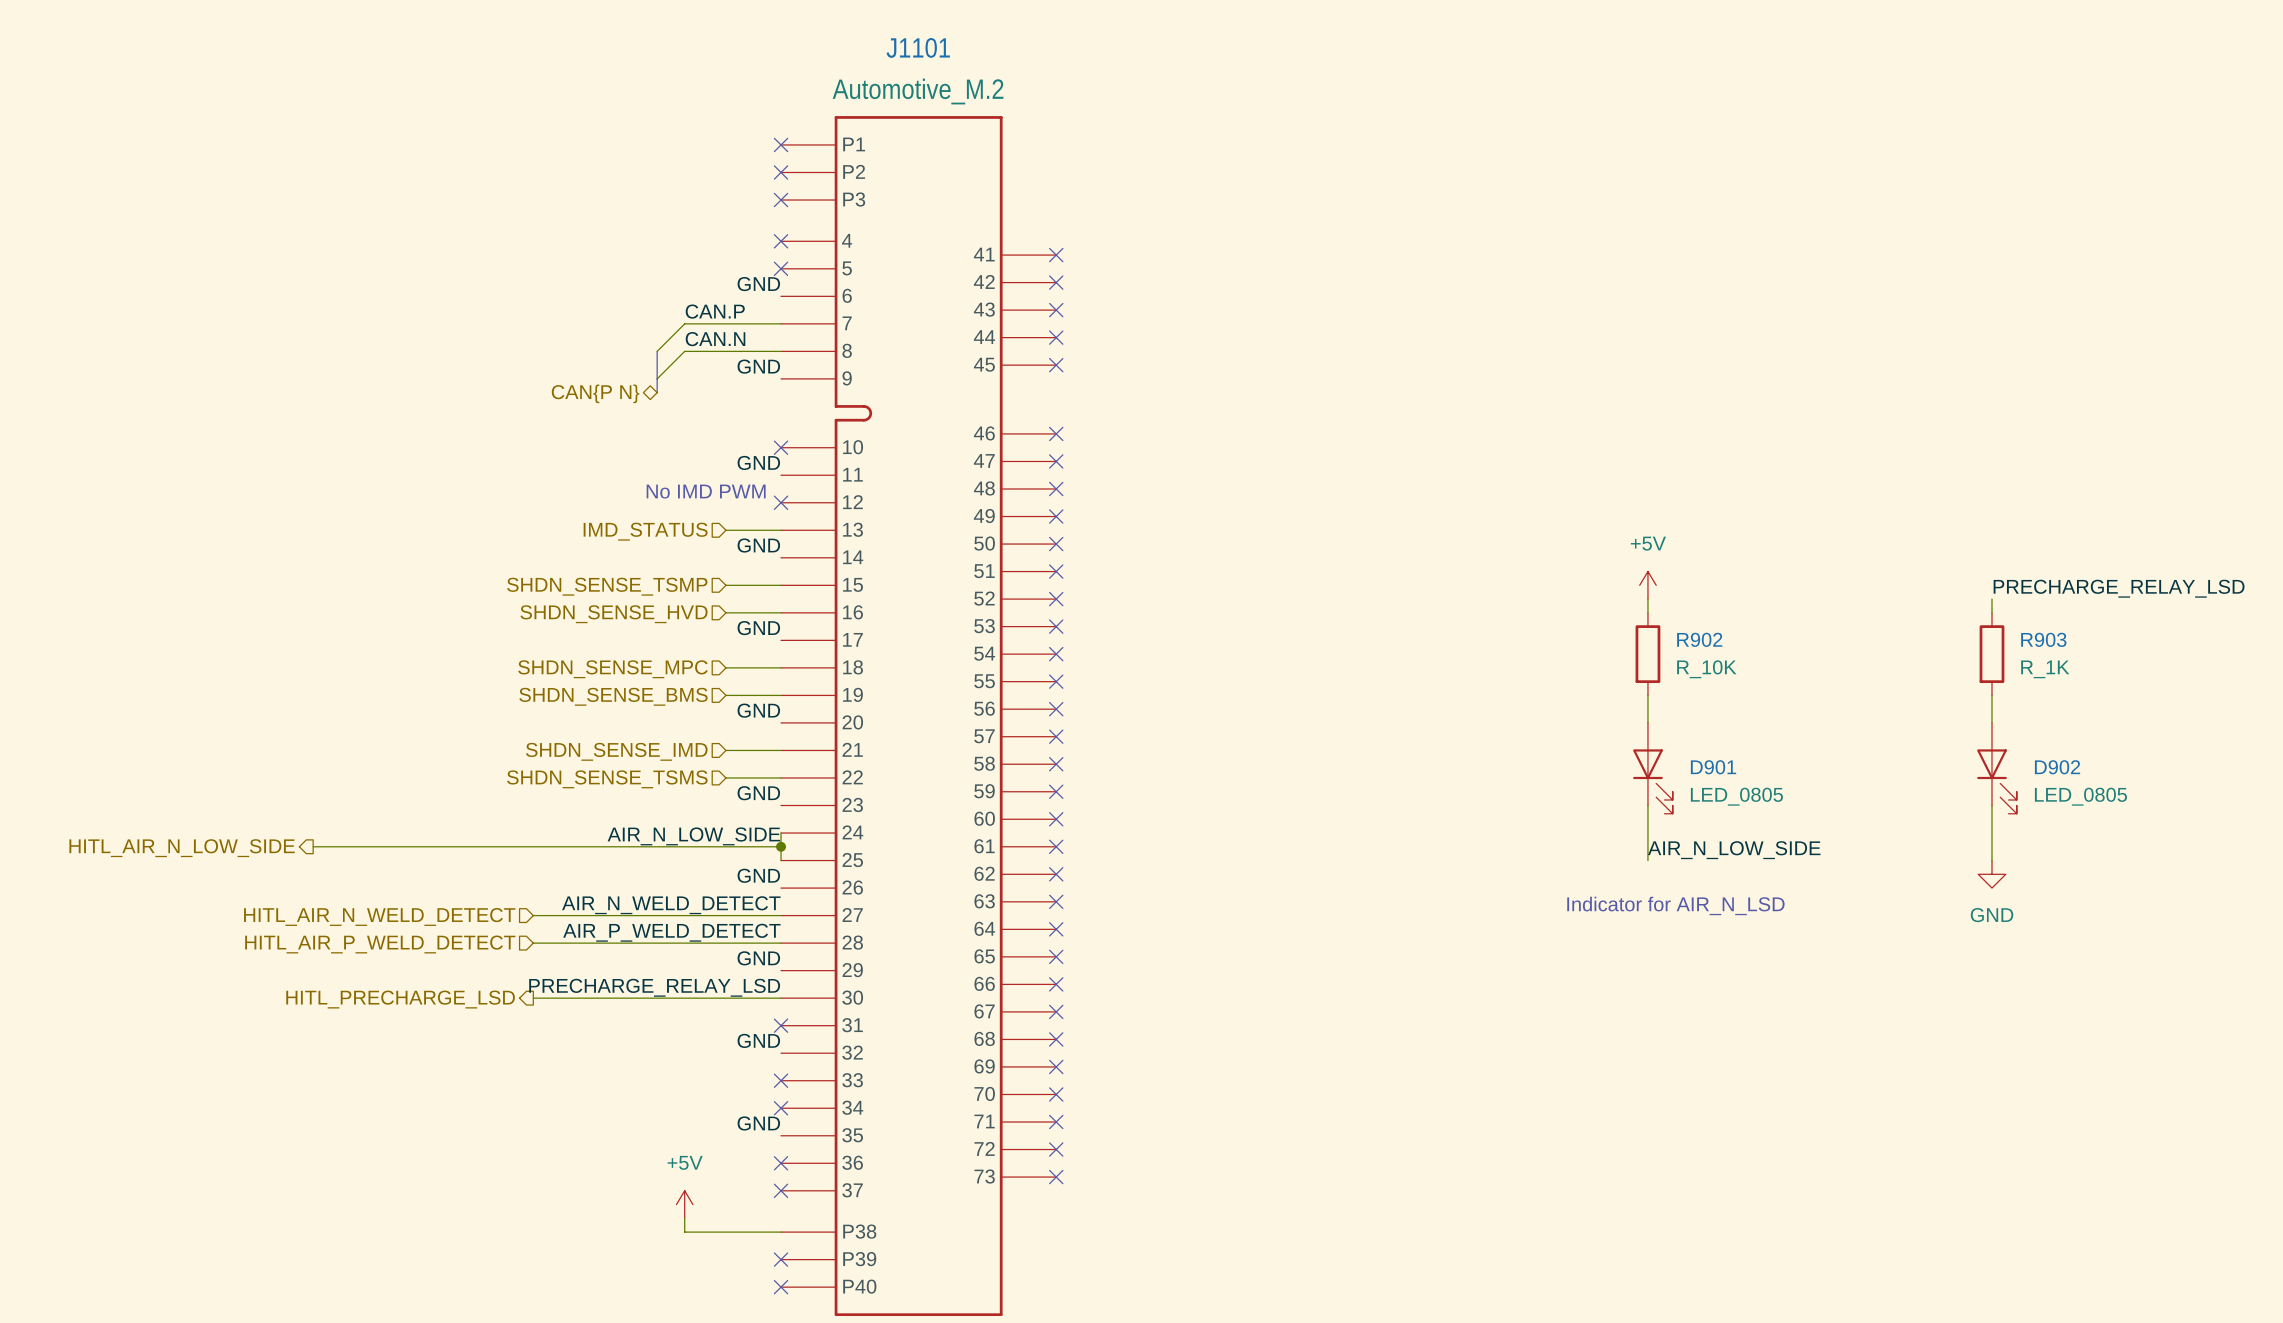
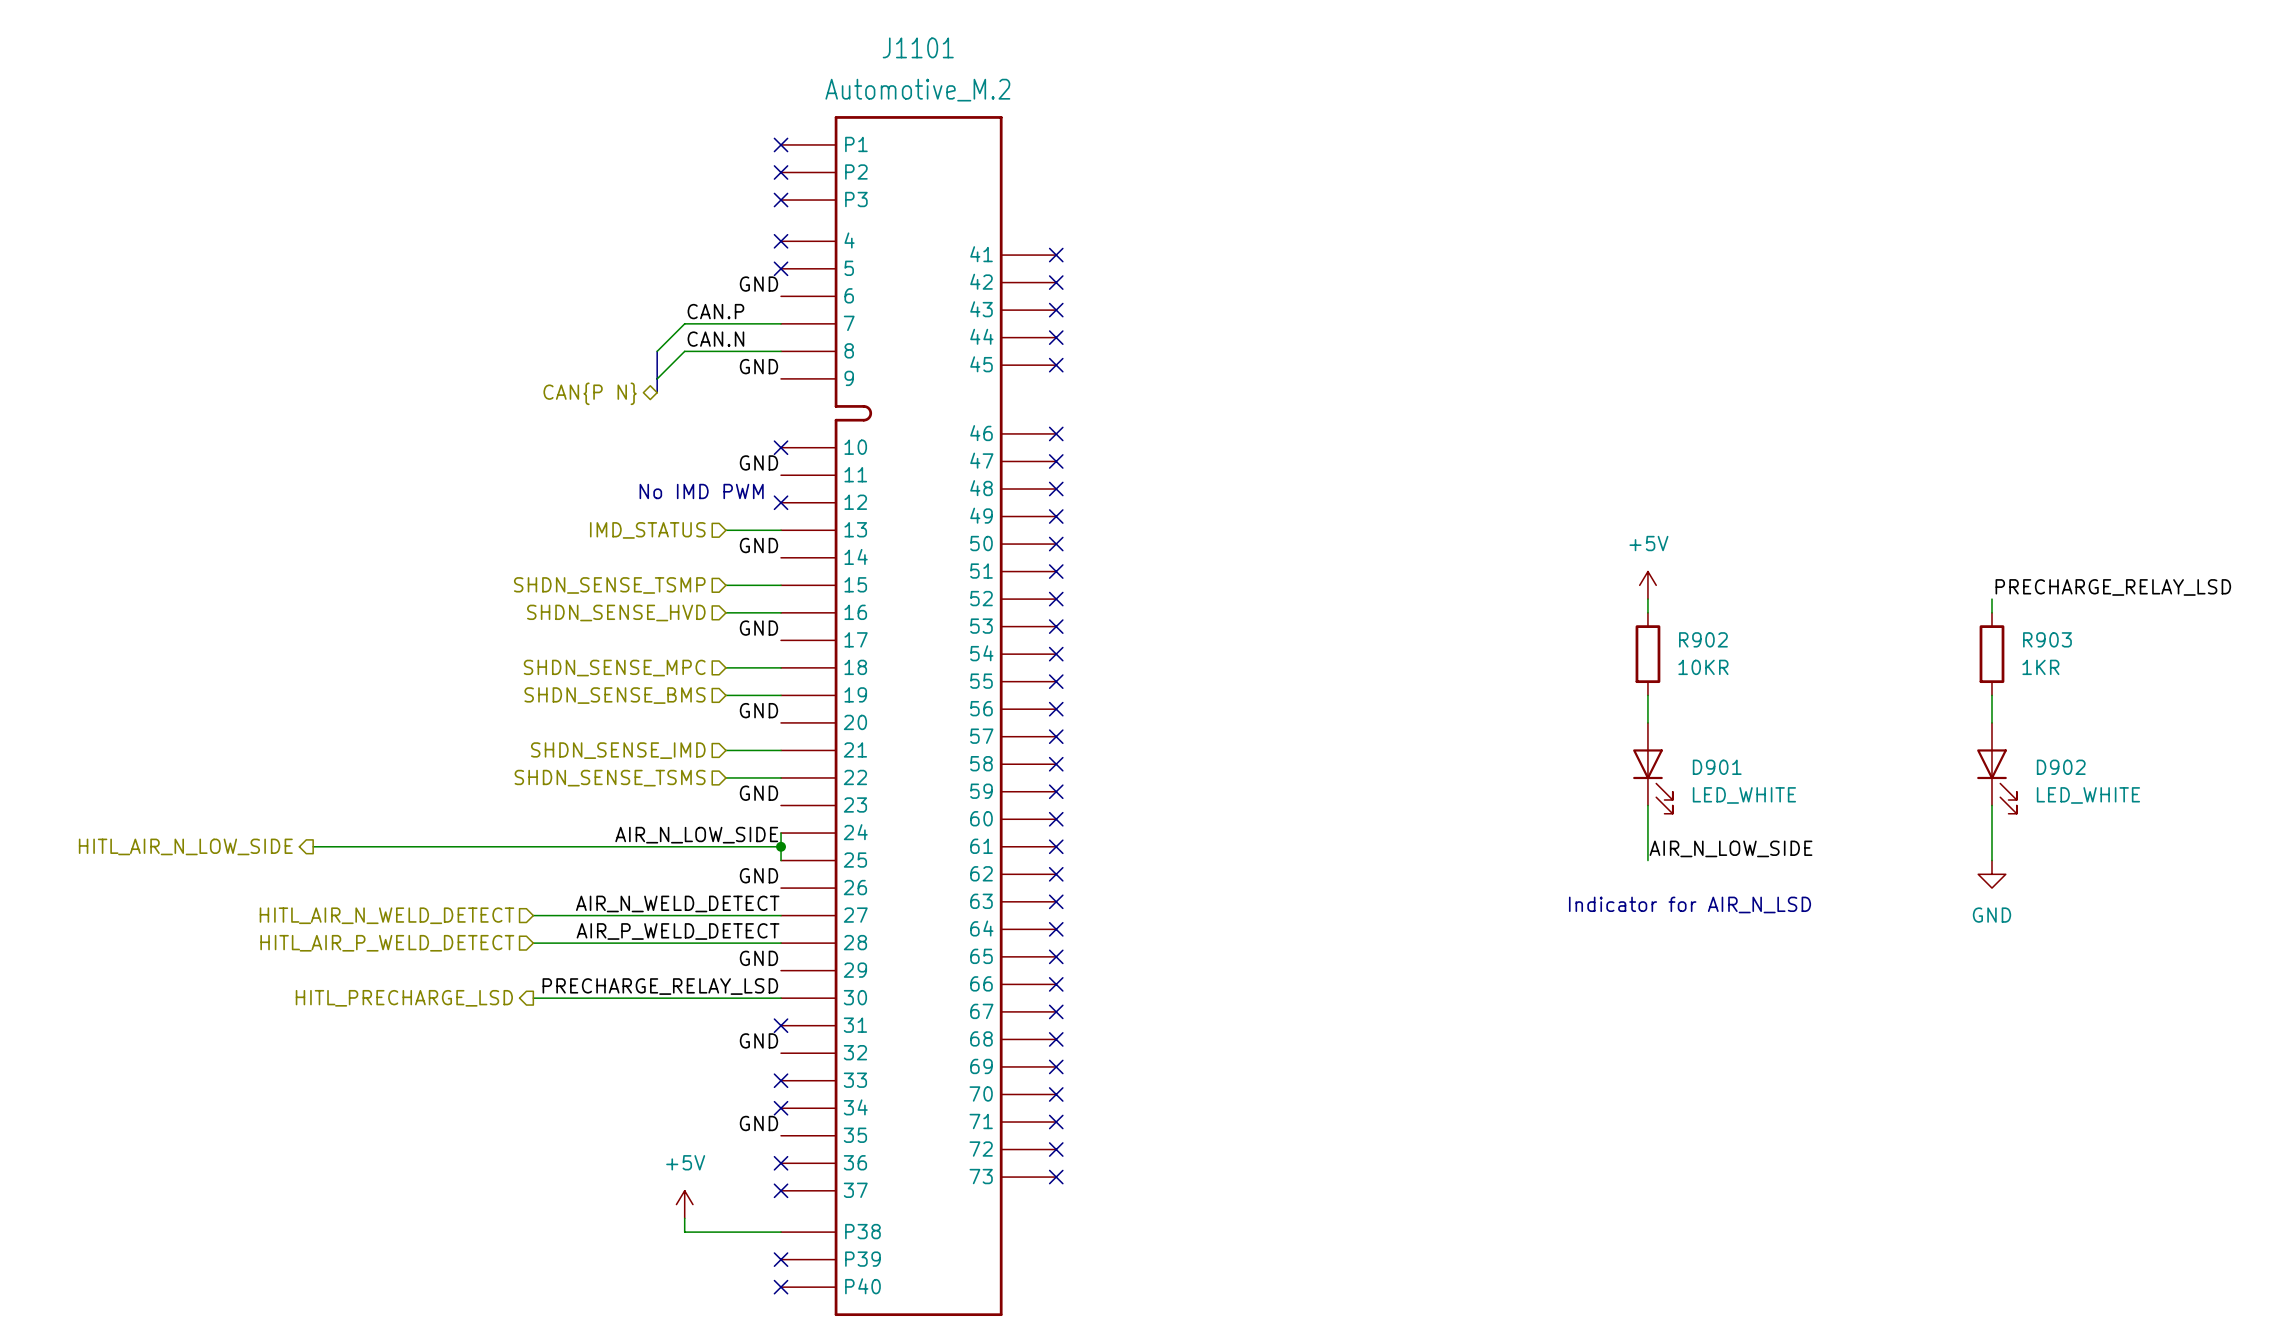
R902 value: R_10K (1706, 669) -> 10KR (1703, 667)
R903 value: R_1K (2045, 669) -> 1KR (2040, 667)
D901 value: LED_0805 (1736, 796) -> LED_WHITE (1744, 795)
D902 value: LED_0805 (2080, 796) -> LED_WHITE (2088, 795)

